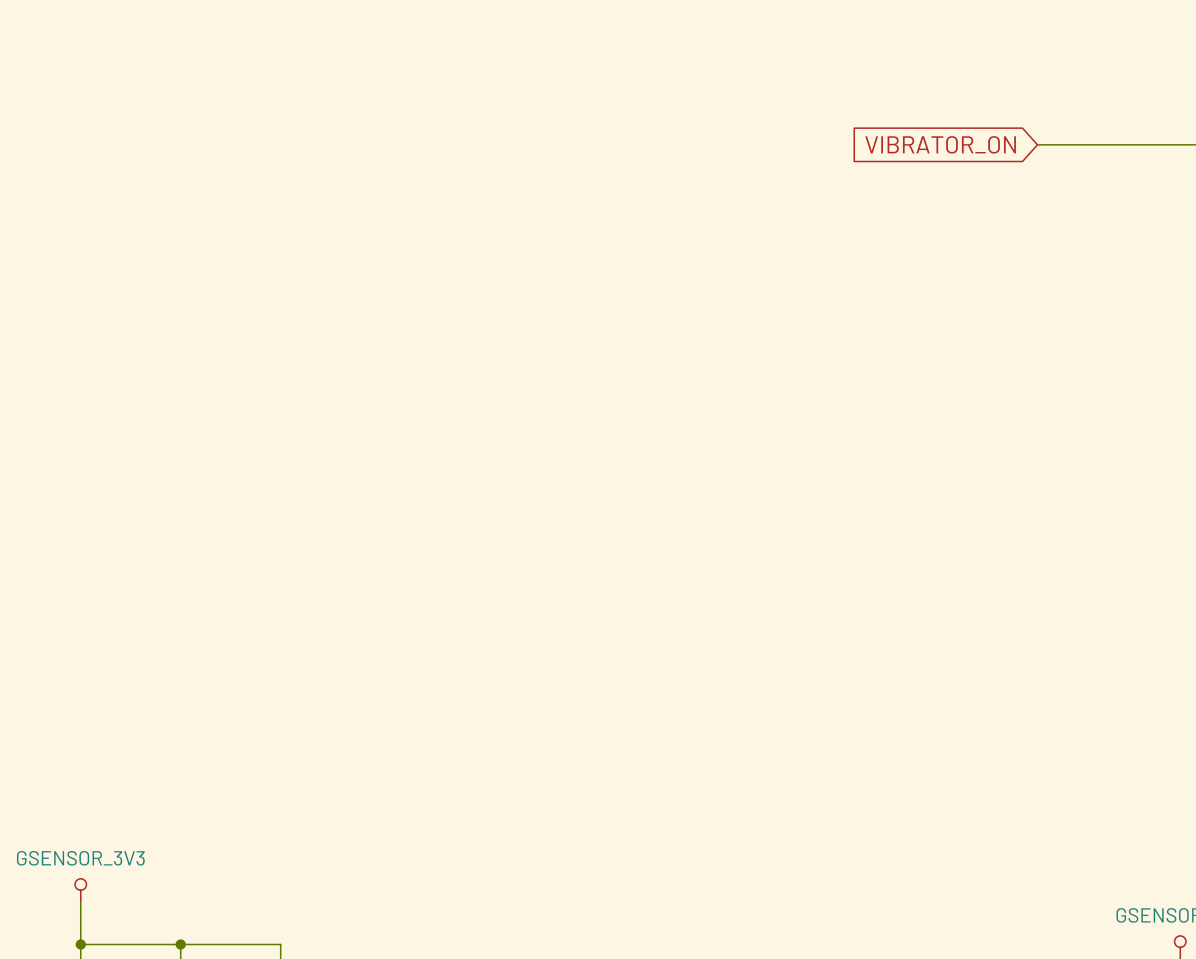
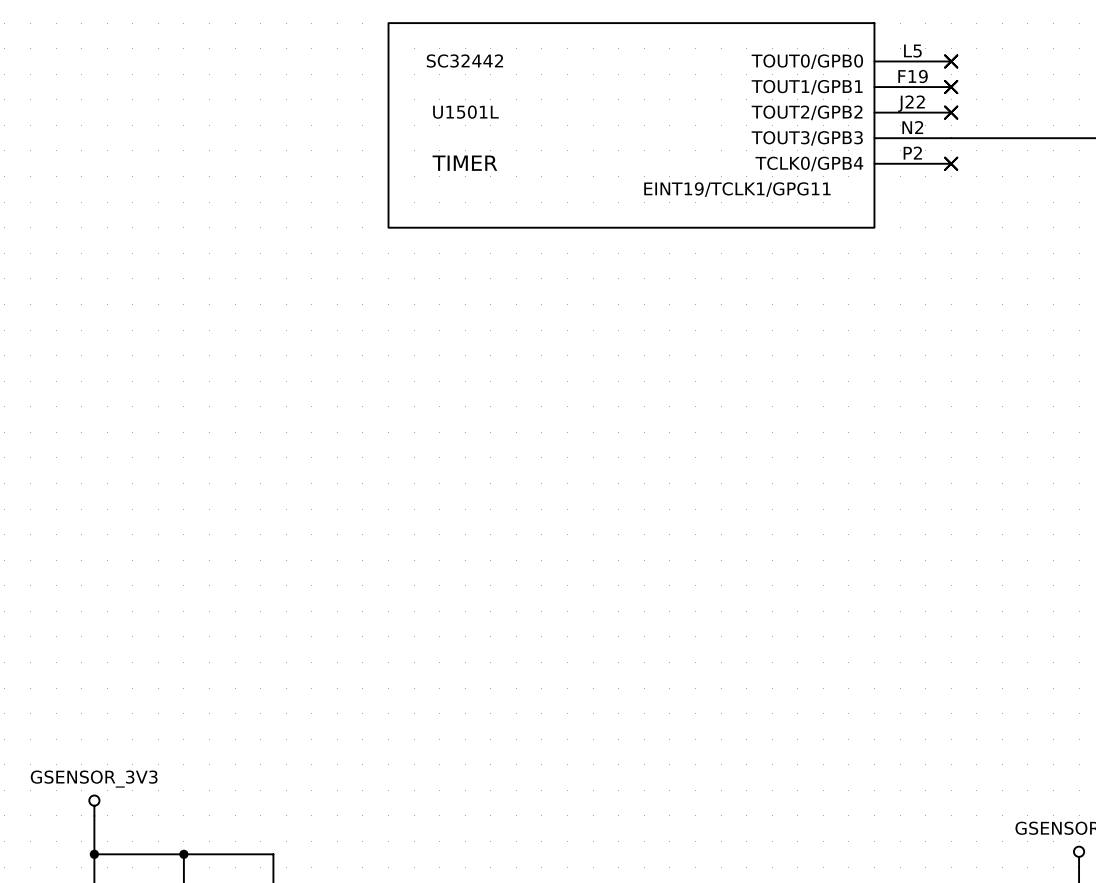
no-connect mark: none -> (951, 61)
no-connect mark: none -> (951, 87)
no-connect mark: none -> (951, 112)
U1501L: none -> SC32442 (669, 125)
global label: VIBRATOR_ON (940, 144) -> none
no-connect mark: none -> (951, 163)

